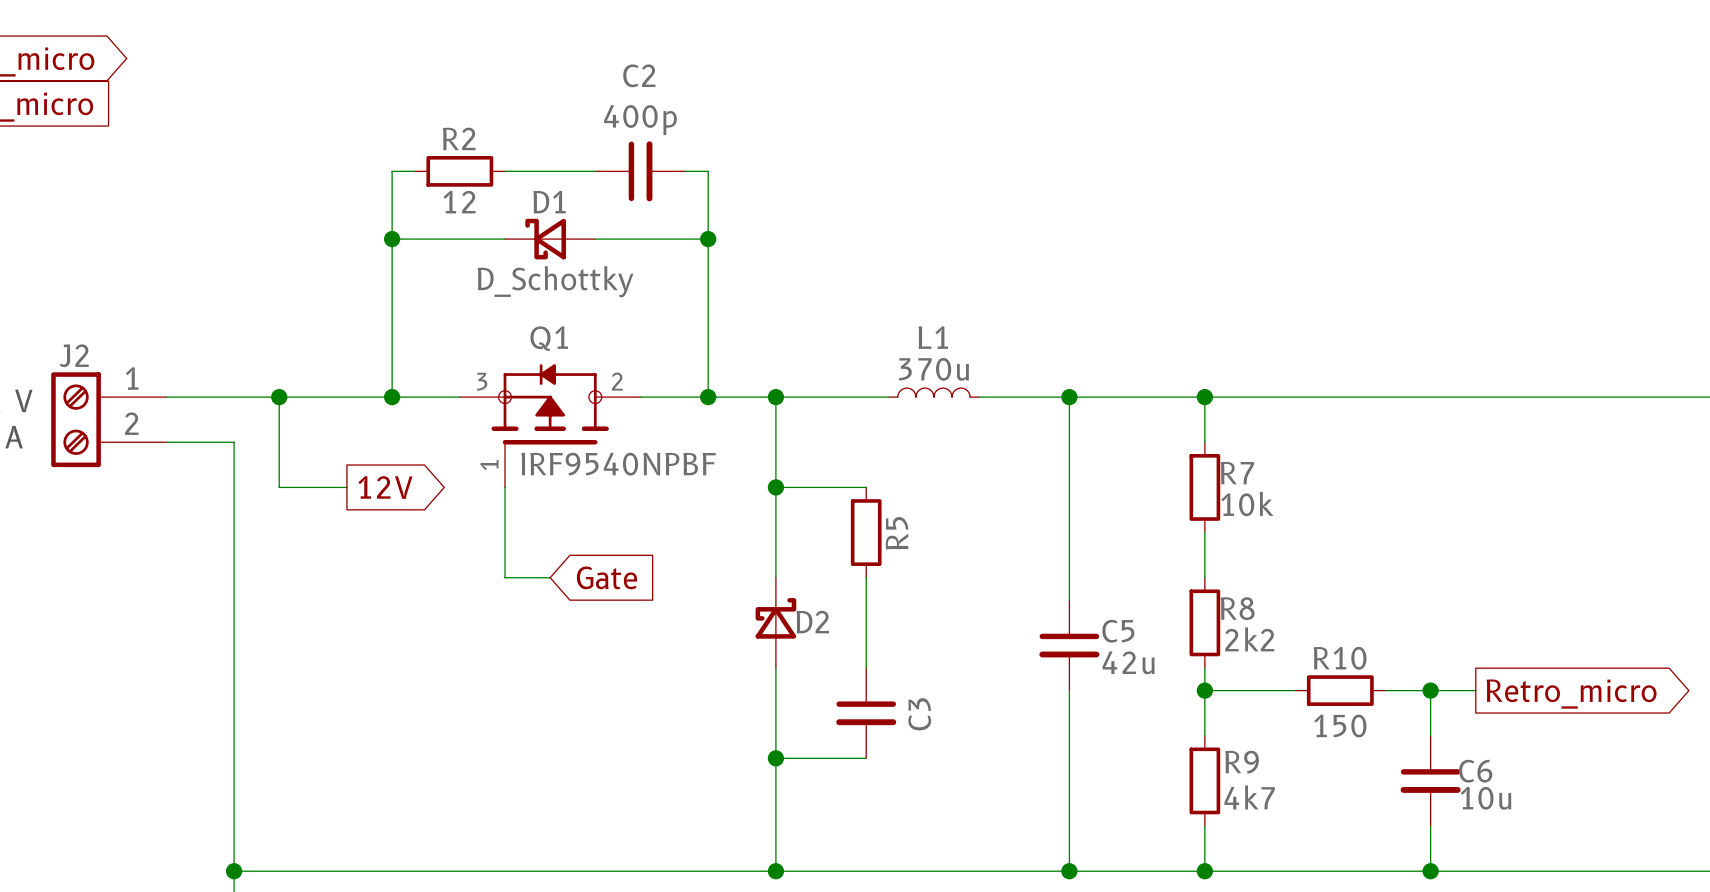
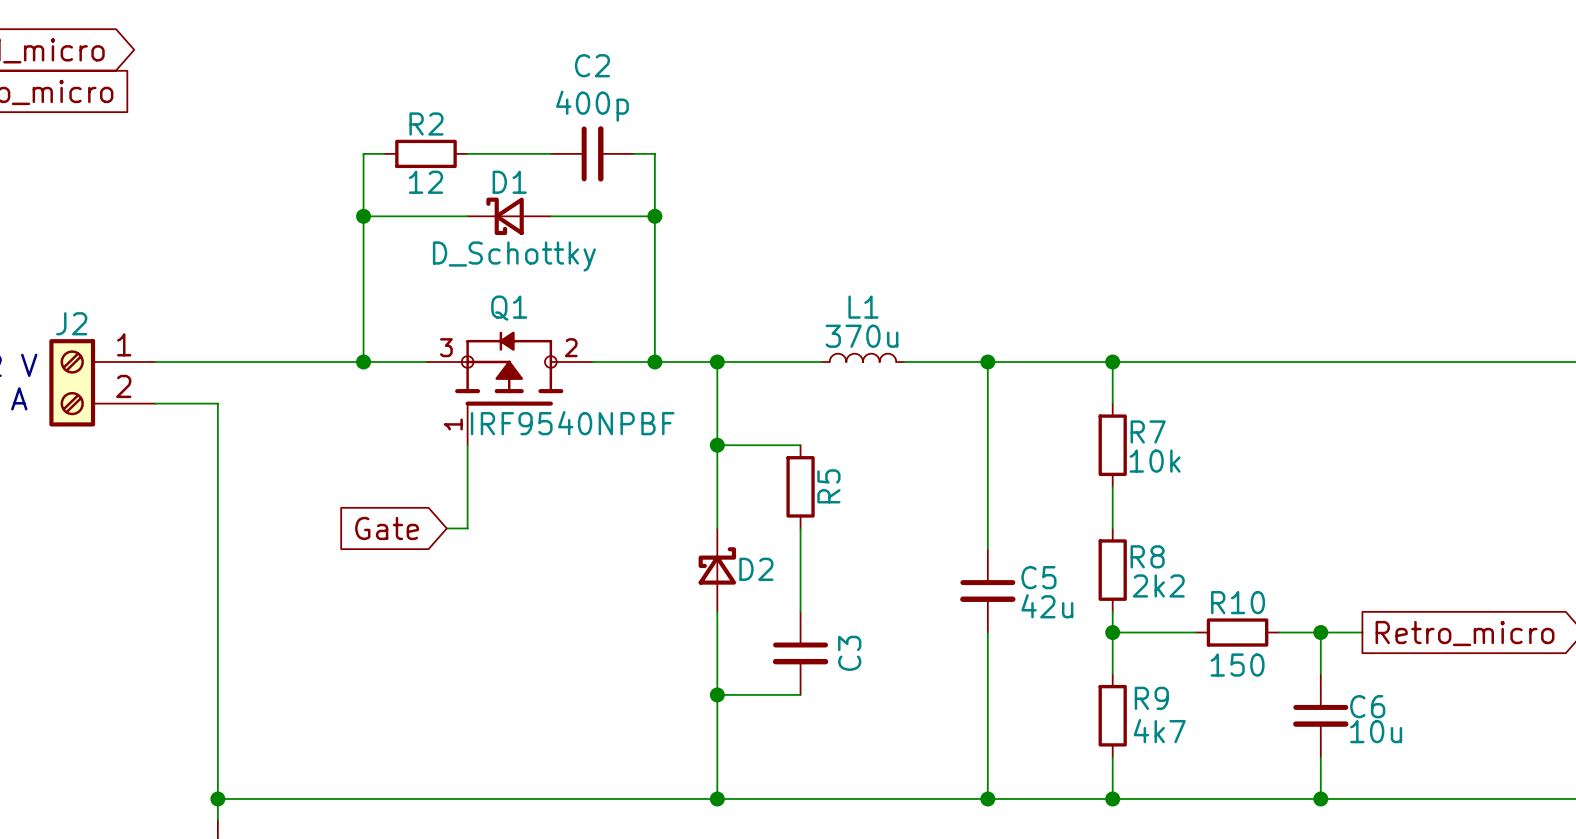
wire: (279, 397) (279, 487) (346, 487) -> none
junction: (279, 397) -> none
global label: 12V (385, 487) -> none
wire: (505, 577) (550, 577) -> (467, 528) (446, 528)
global label rotation: 0° (606, 577) -> 180° (387, 528)
global label position: Gate (606, 577) -> Gate (387, 528)

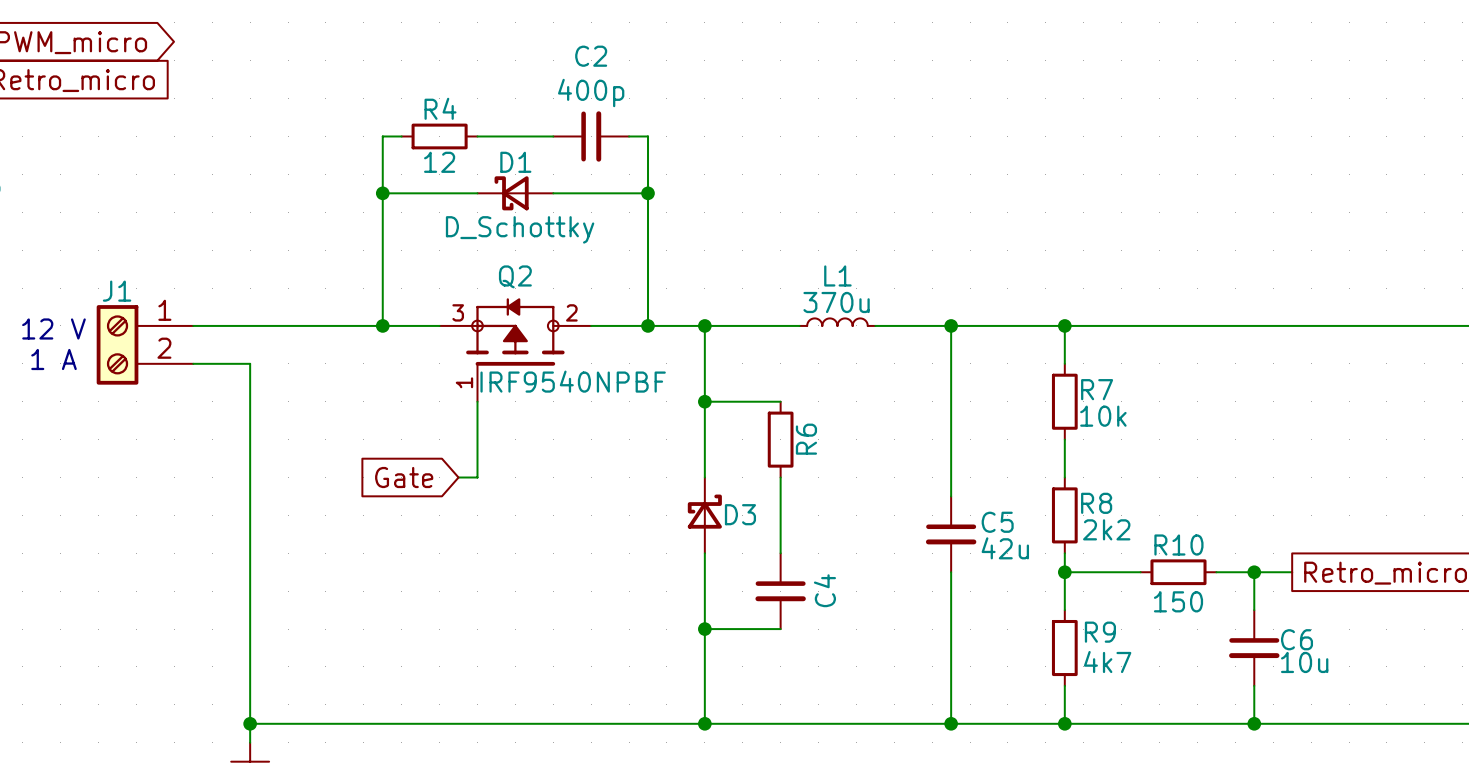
R2 name: R2 (426, 123) -> R4 (440, 108)
Q1 name: Q1 (509, 308) -> Q2 (515, 276)
J2 name: J2 (71, 323) -> J1 (117, 291)
R5 name: R5 (828, 486) -> R6 (806, 439)
D2 name: D2 (756, 569) -> D3 (740, 514)
C3 name: C3 (849, 653) -> C4 (824, 590)

